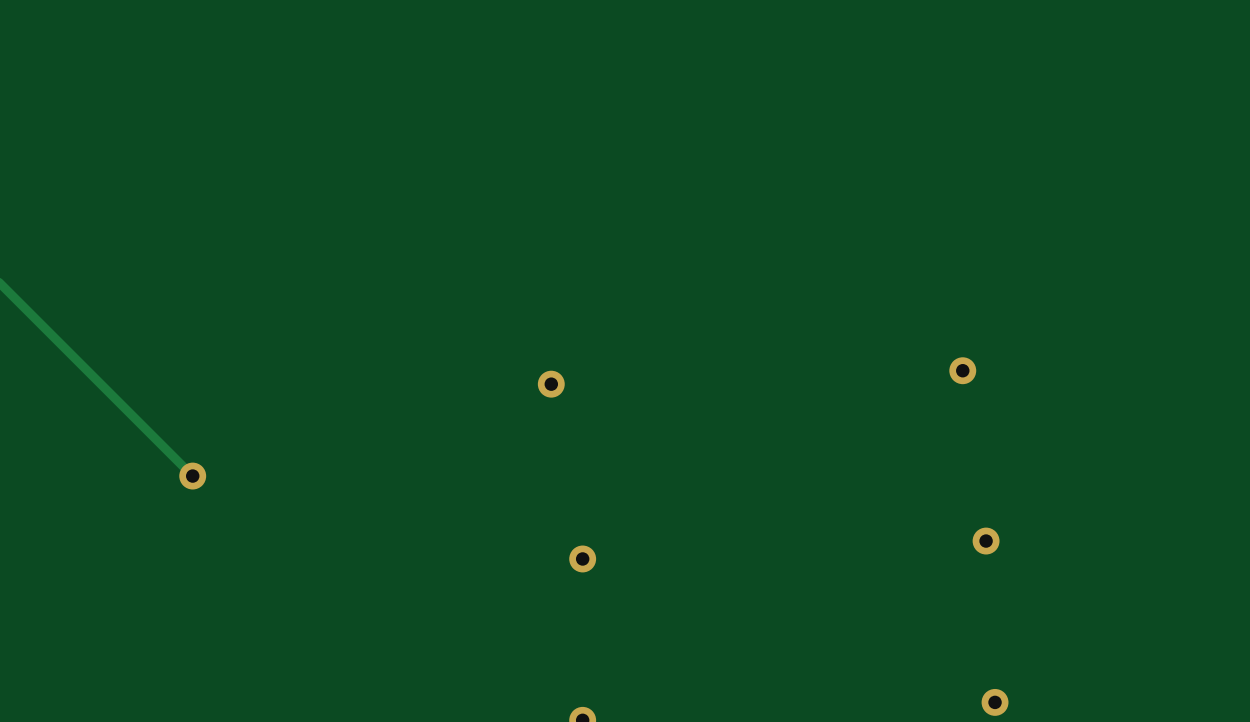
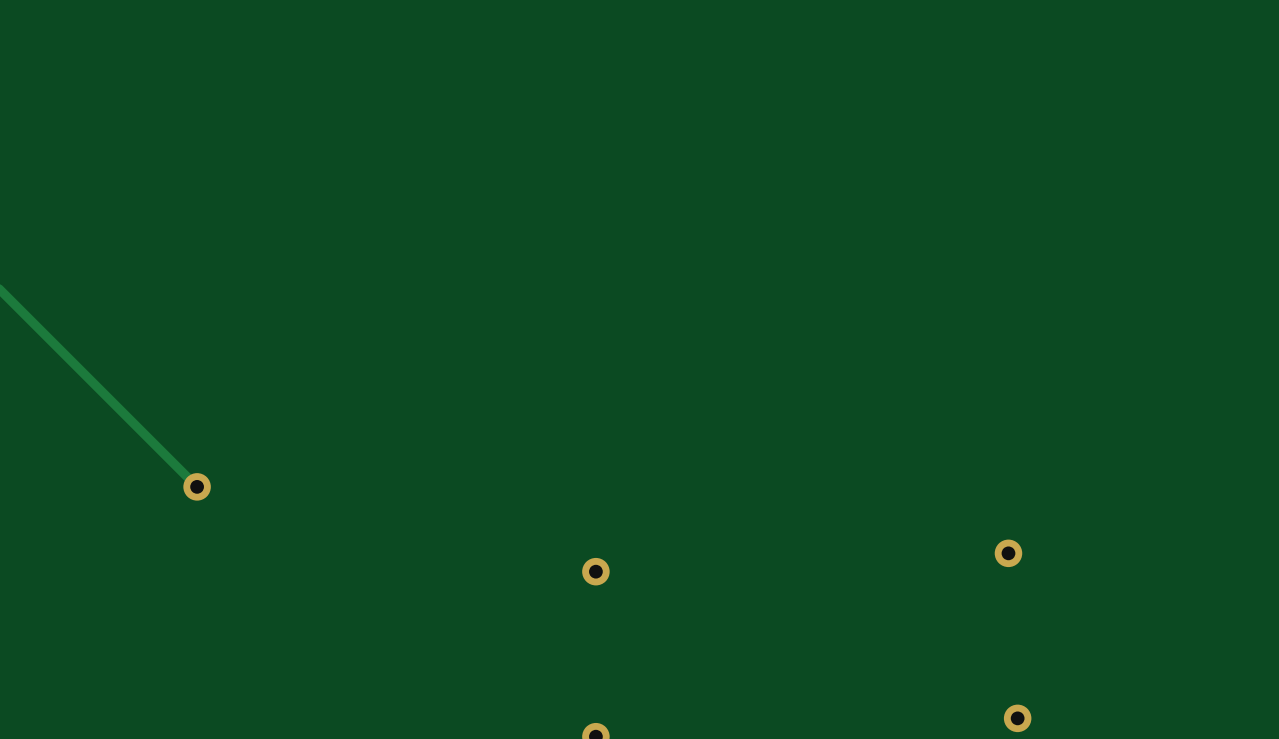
via: (962, 370) -> none
via: (551, 384) -> none

